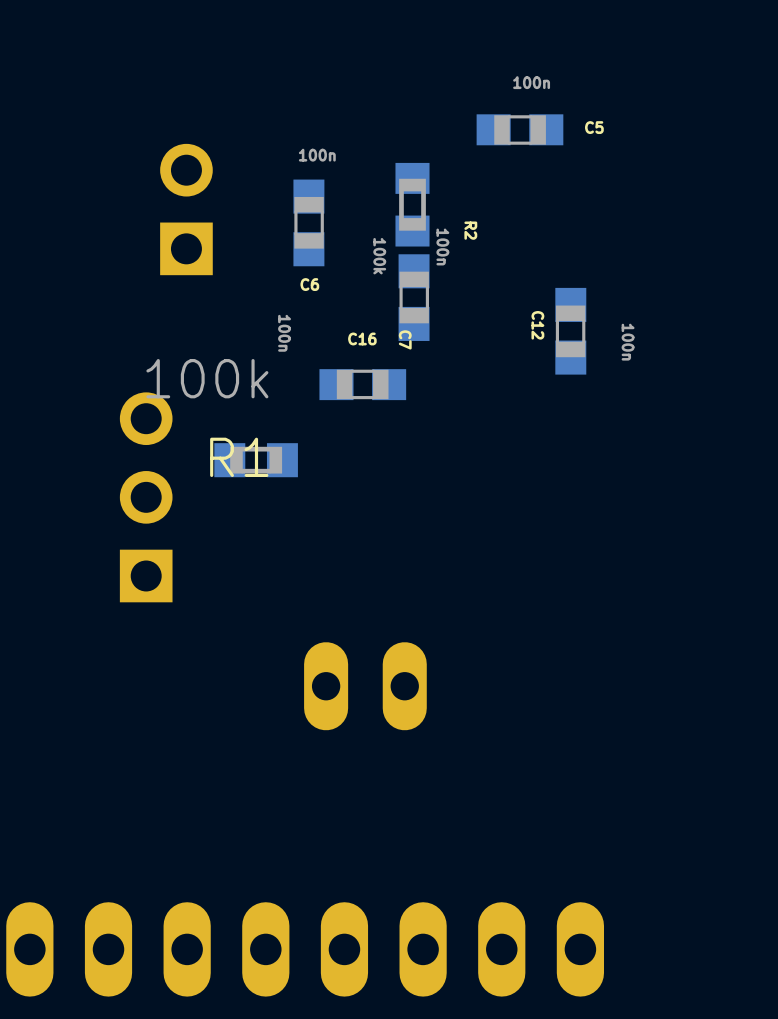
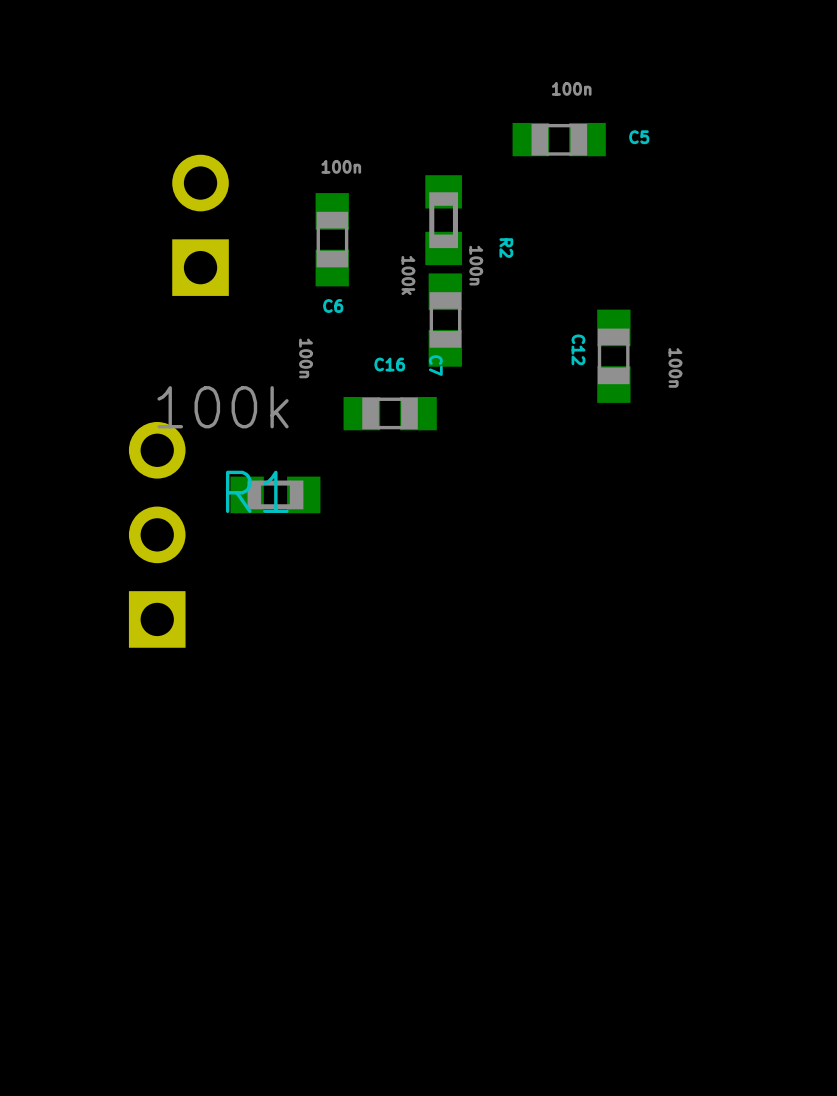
part: (365, 686) -> none
part: (305, 949) -> none

